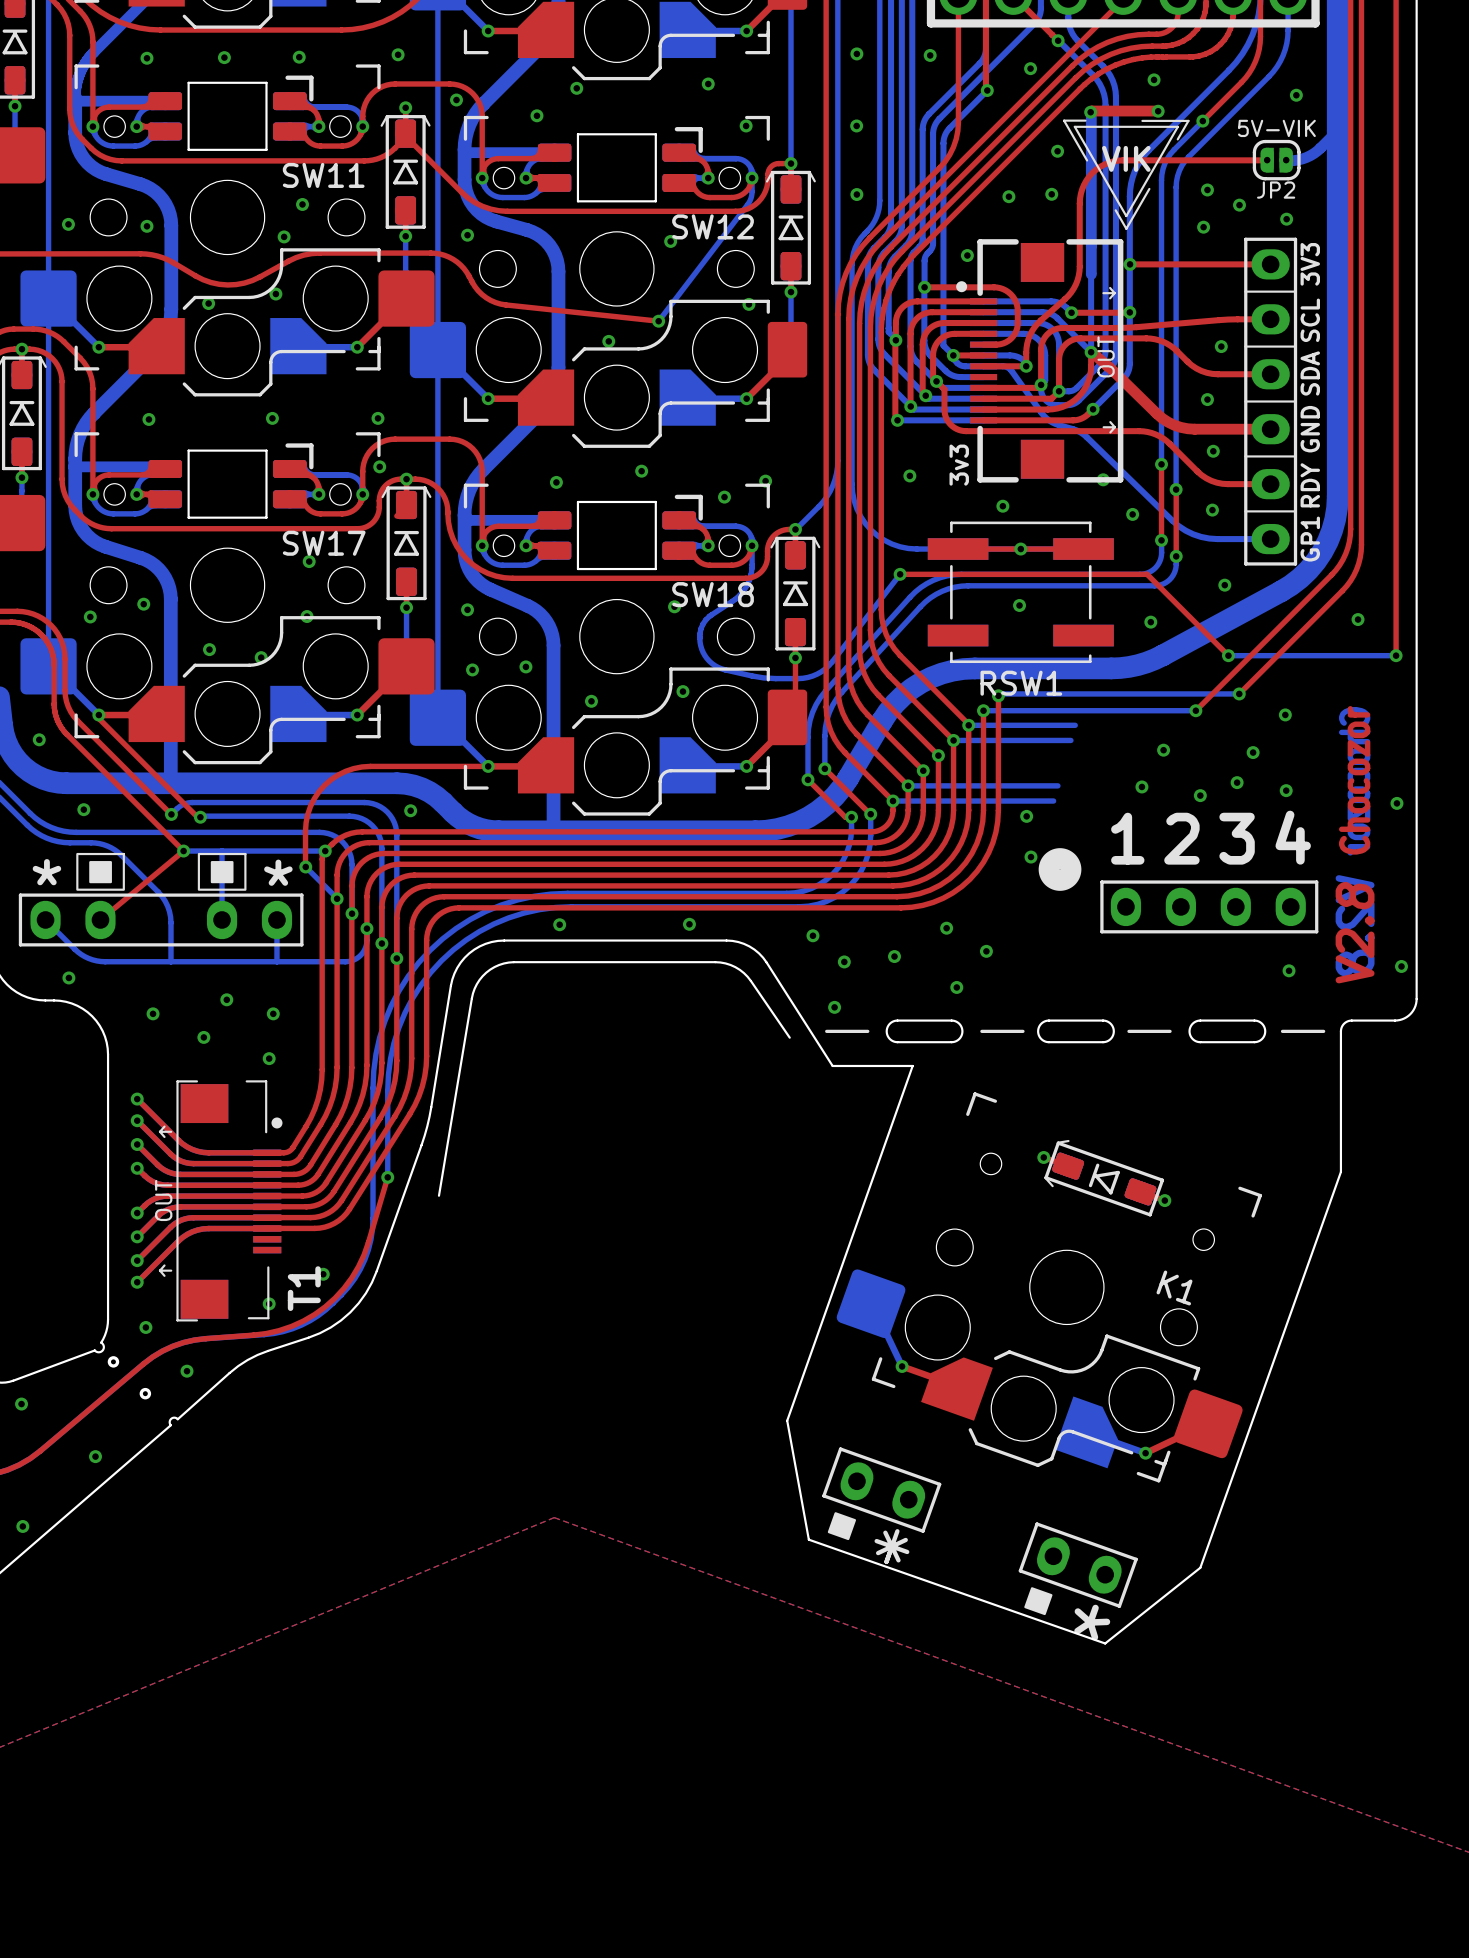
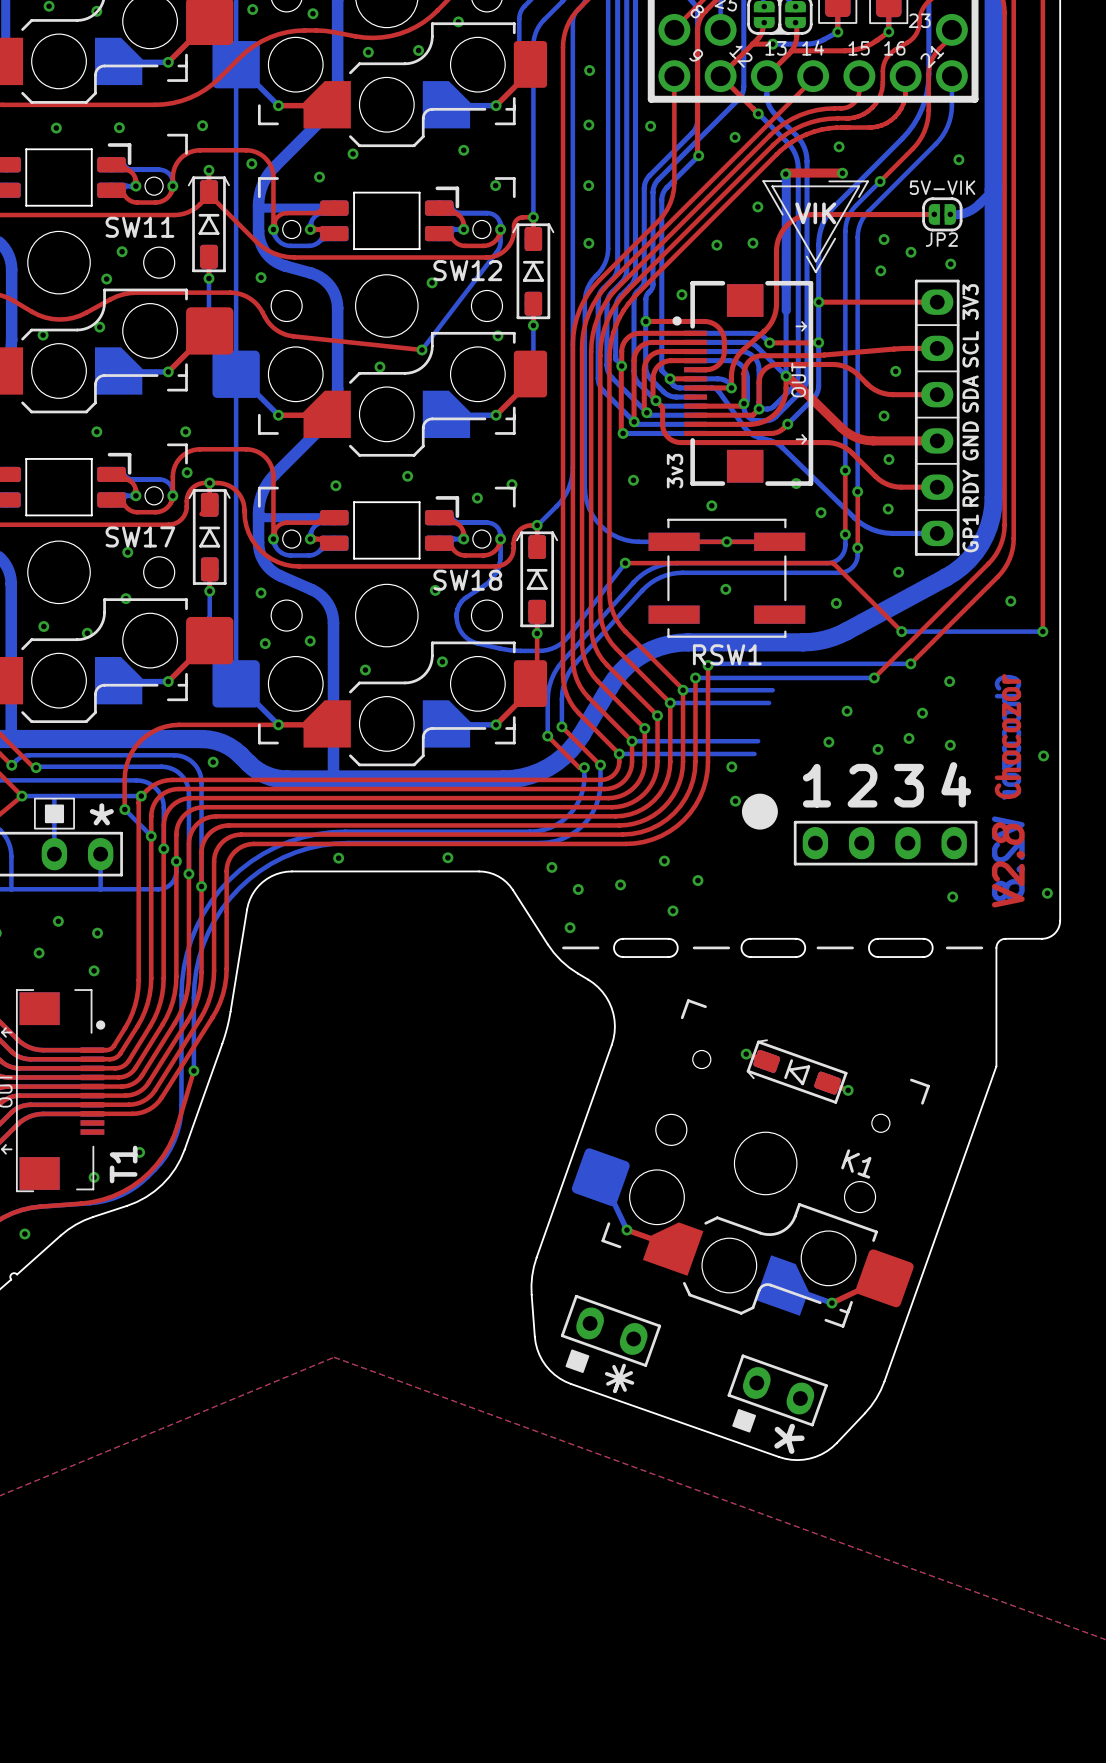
board edge: (766, 962) (832, 1065) (912, 1065) (787, 1420) (808, 1539) (1105, 1643) (1200, 1567) (1208, 1546) -> (512, 889) (553, 952) (569, 967) (593, 983) (602, 991) (611, 1008) (614, 1020) (611, 1044) (533, 1266) (531, 1285) (534, 1336) (539, 1354) (545, 1365) (554, 1374) (571, 1384) (779, 1457) (797, 1460) (816, 1456) (832, 1447) (870, 1406) (884, 1381)
board edge: (789, 1037) (747, 976) (735, 967) (725, 963) (513, 962) (494, 967) (482, 976) (472, 993) (438, 1195) -> none
K1 footprint: [822, 1092, 1262, 1616] -> [560, 999, 930, 1433]

